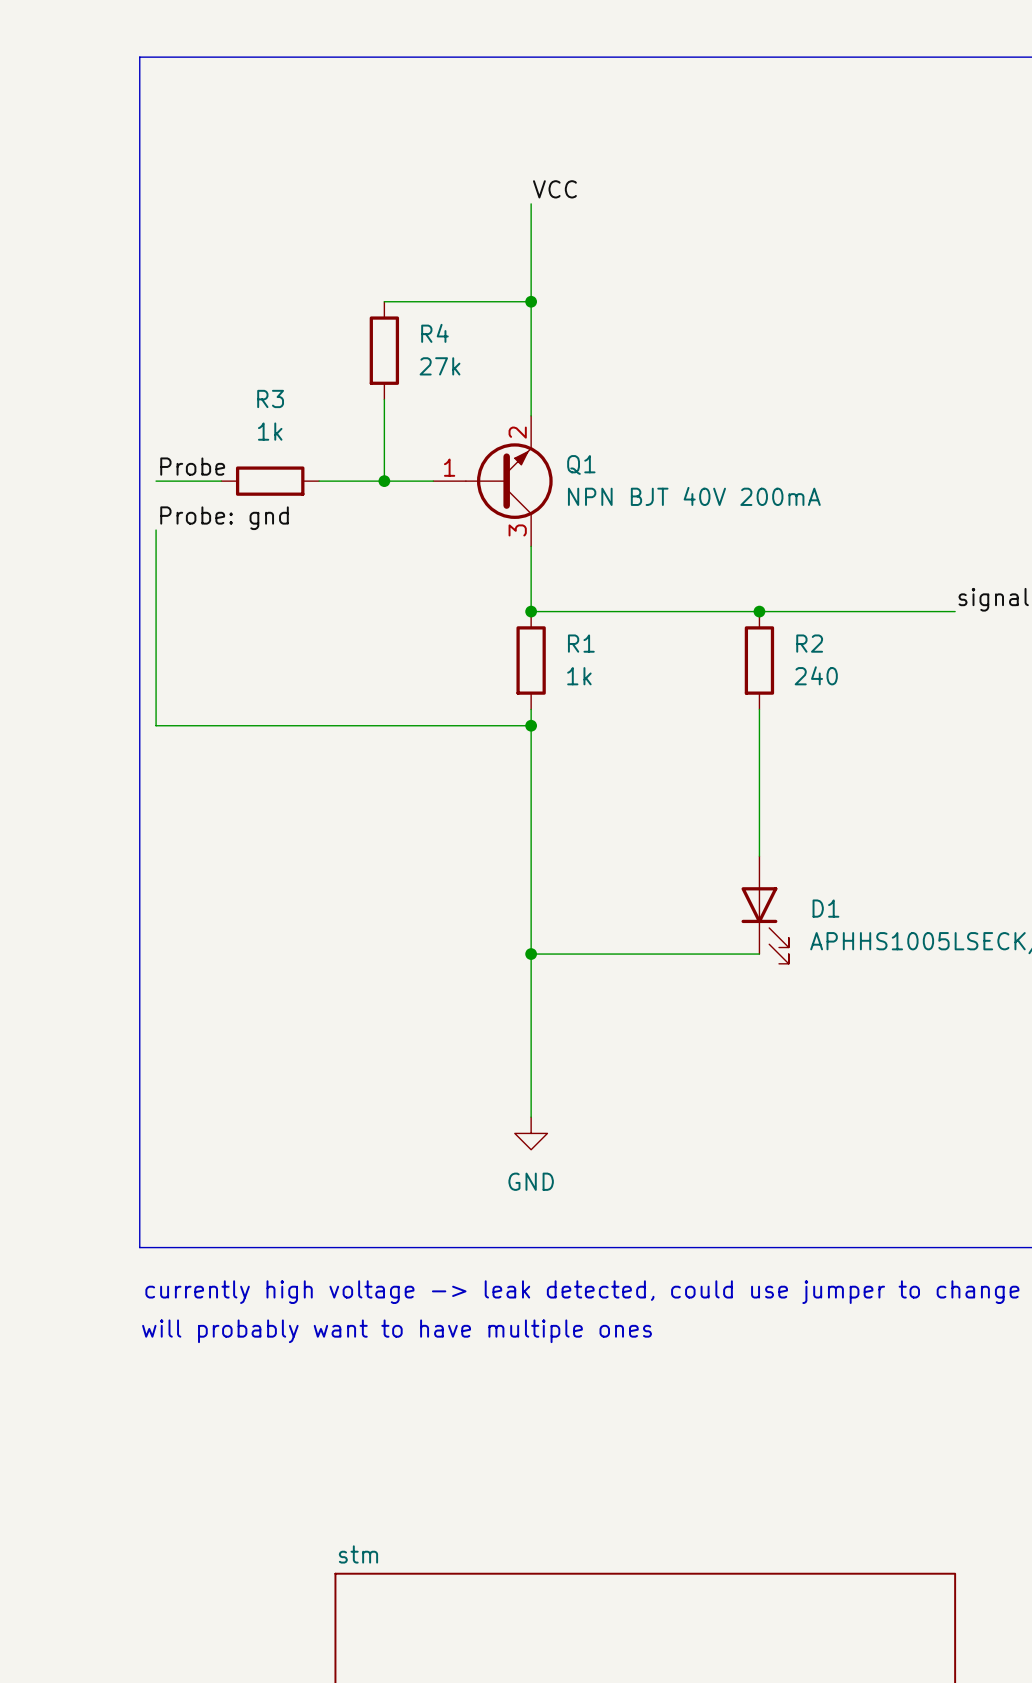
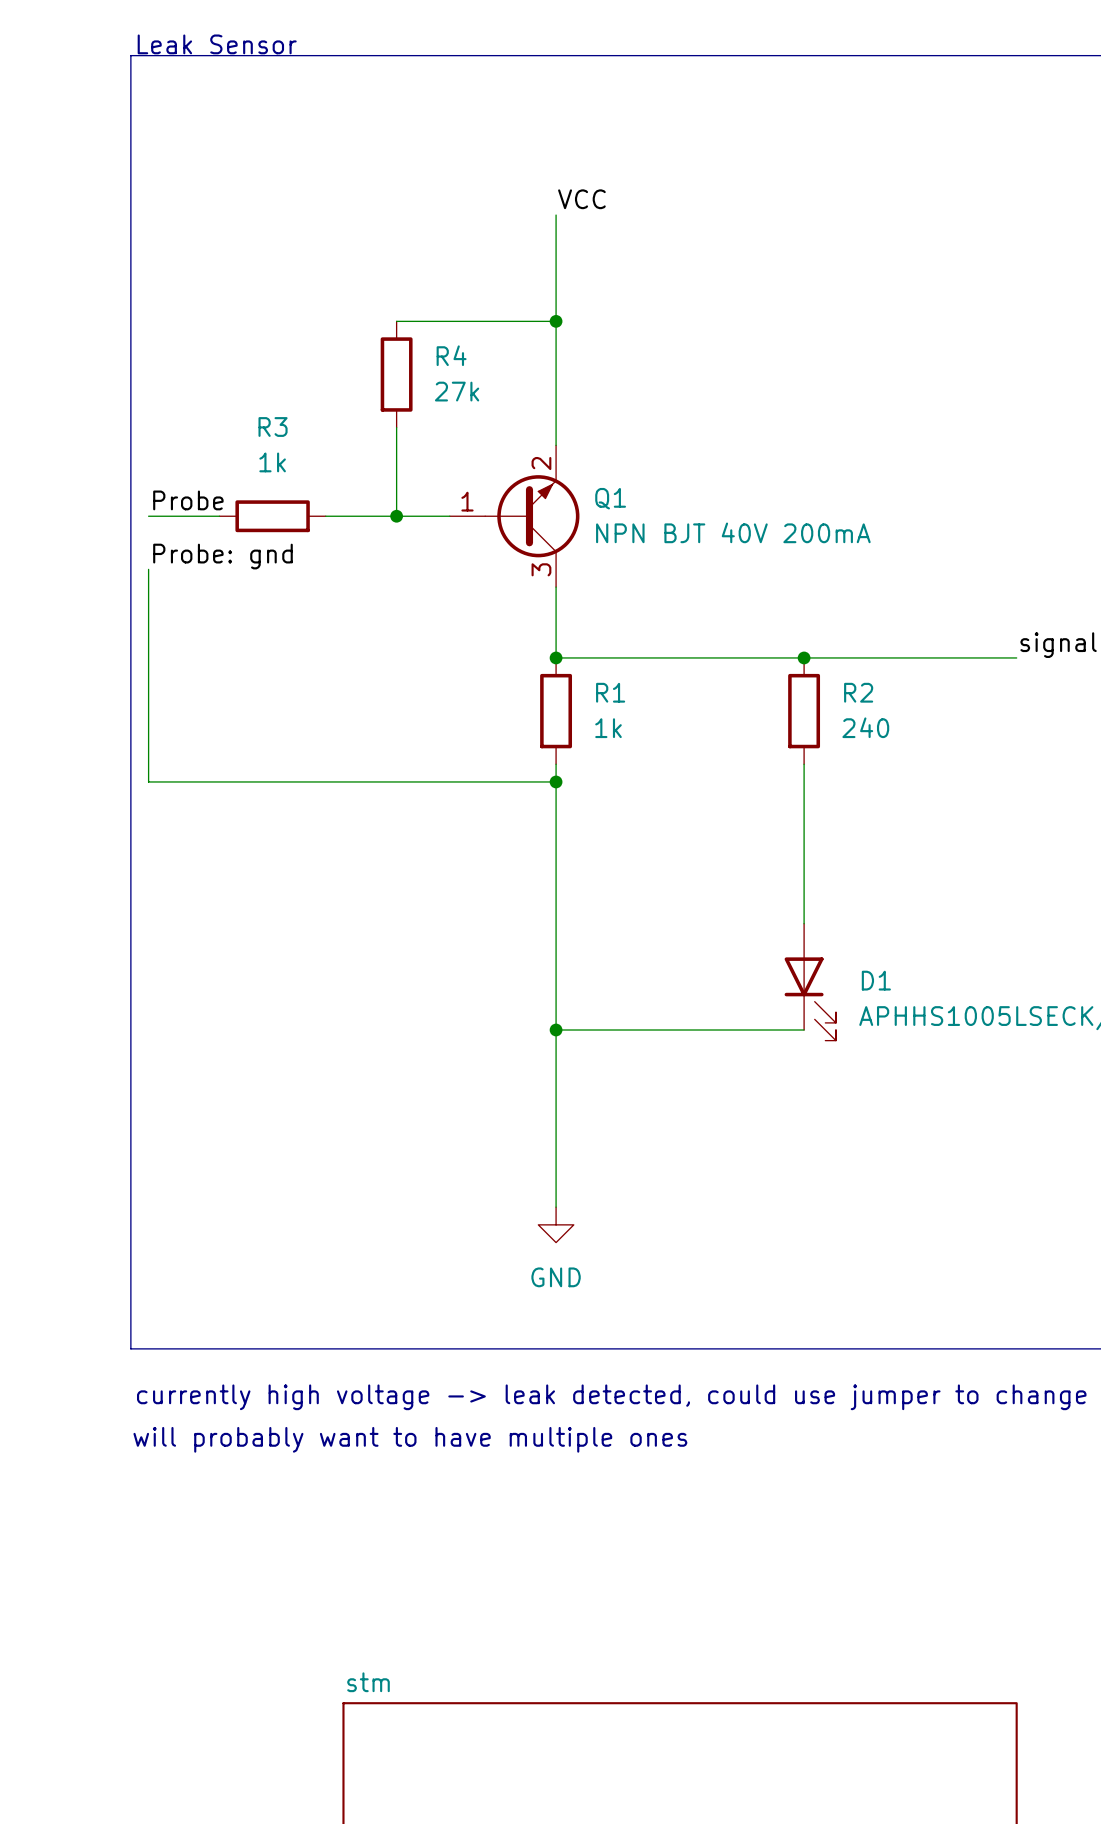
text: none -> Leak Sensor (217, 44)

